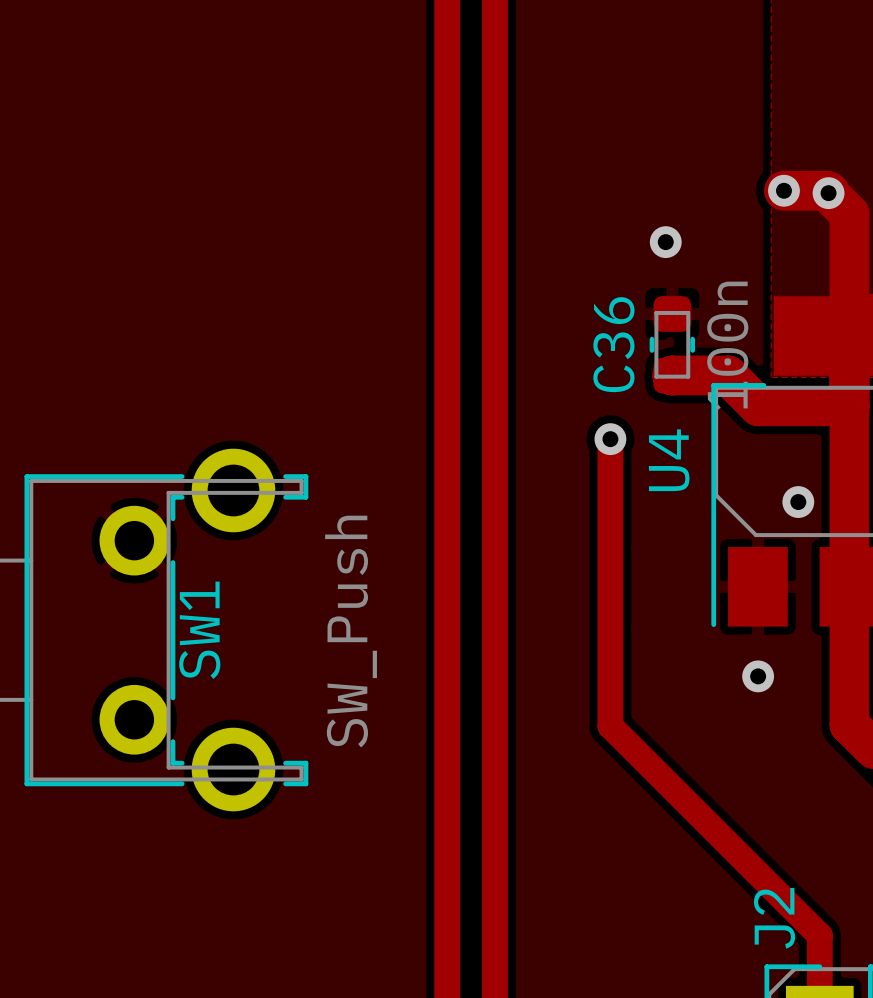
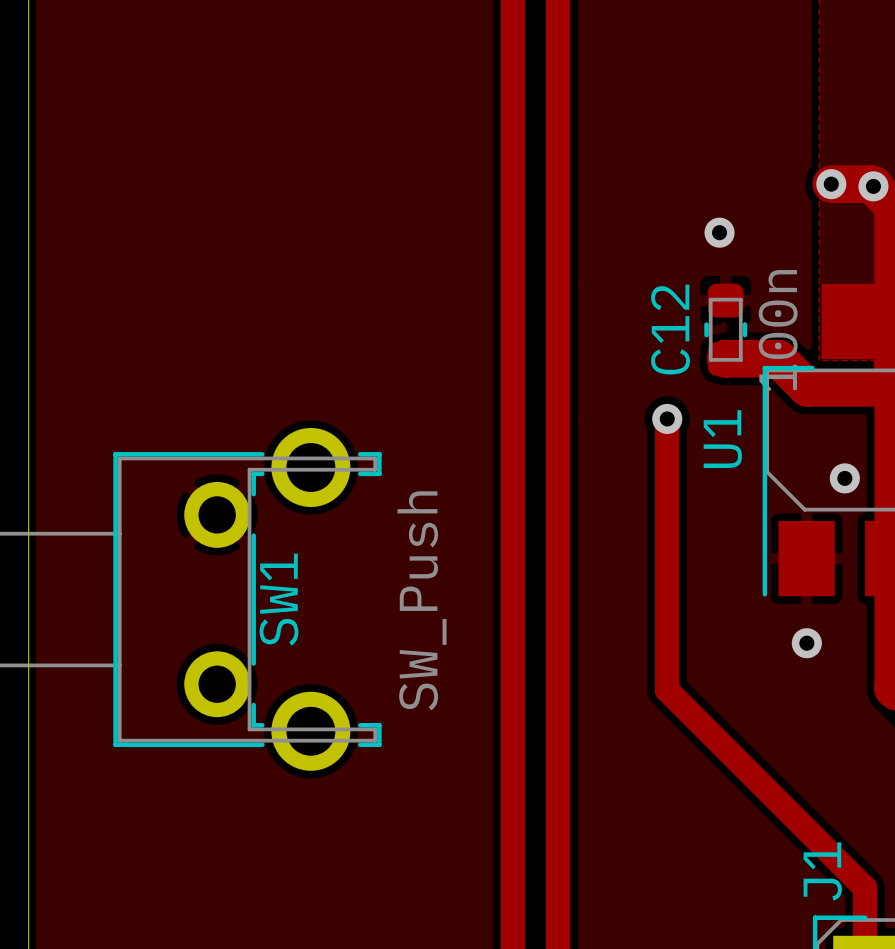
C36 name: C36 (613, 344) -> C12 (670, 329)
U4 name: U4 (669, 460) -> U1 (722, 439)
J2 name: J2 (774, 918) -> J1 (822, 871)

